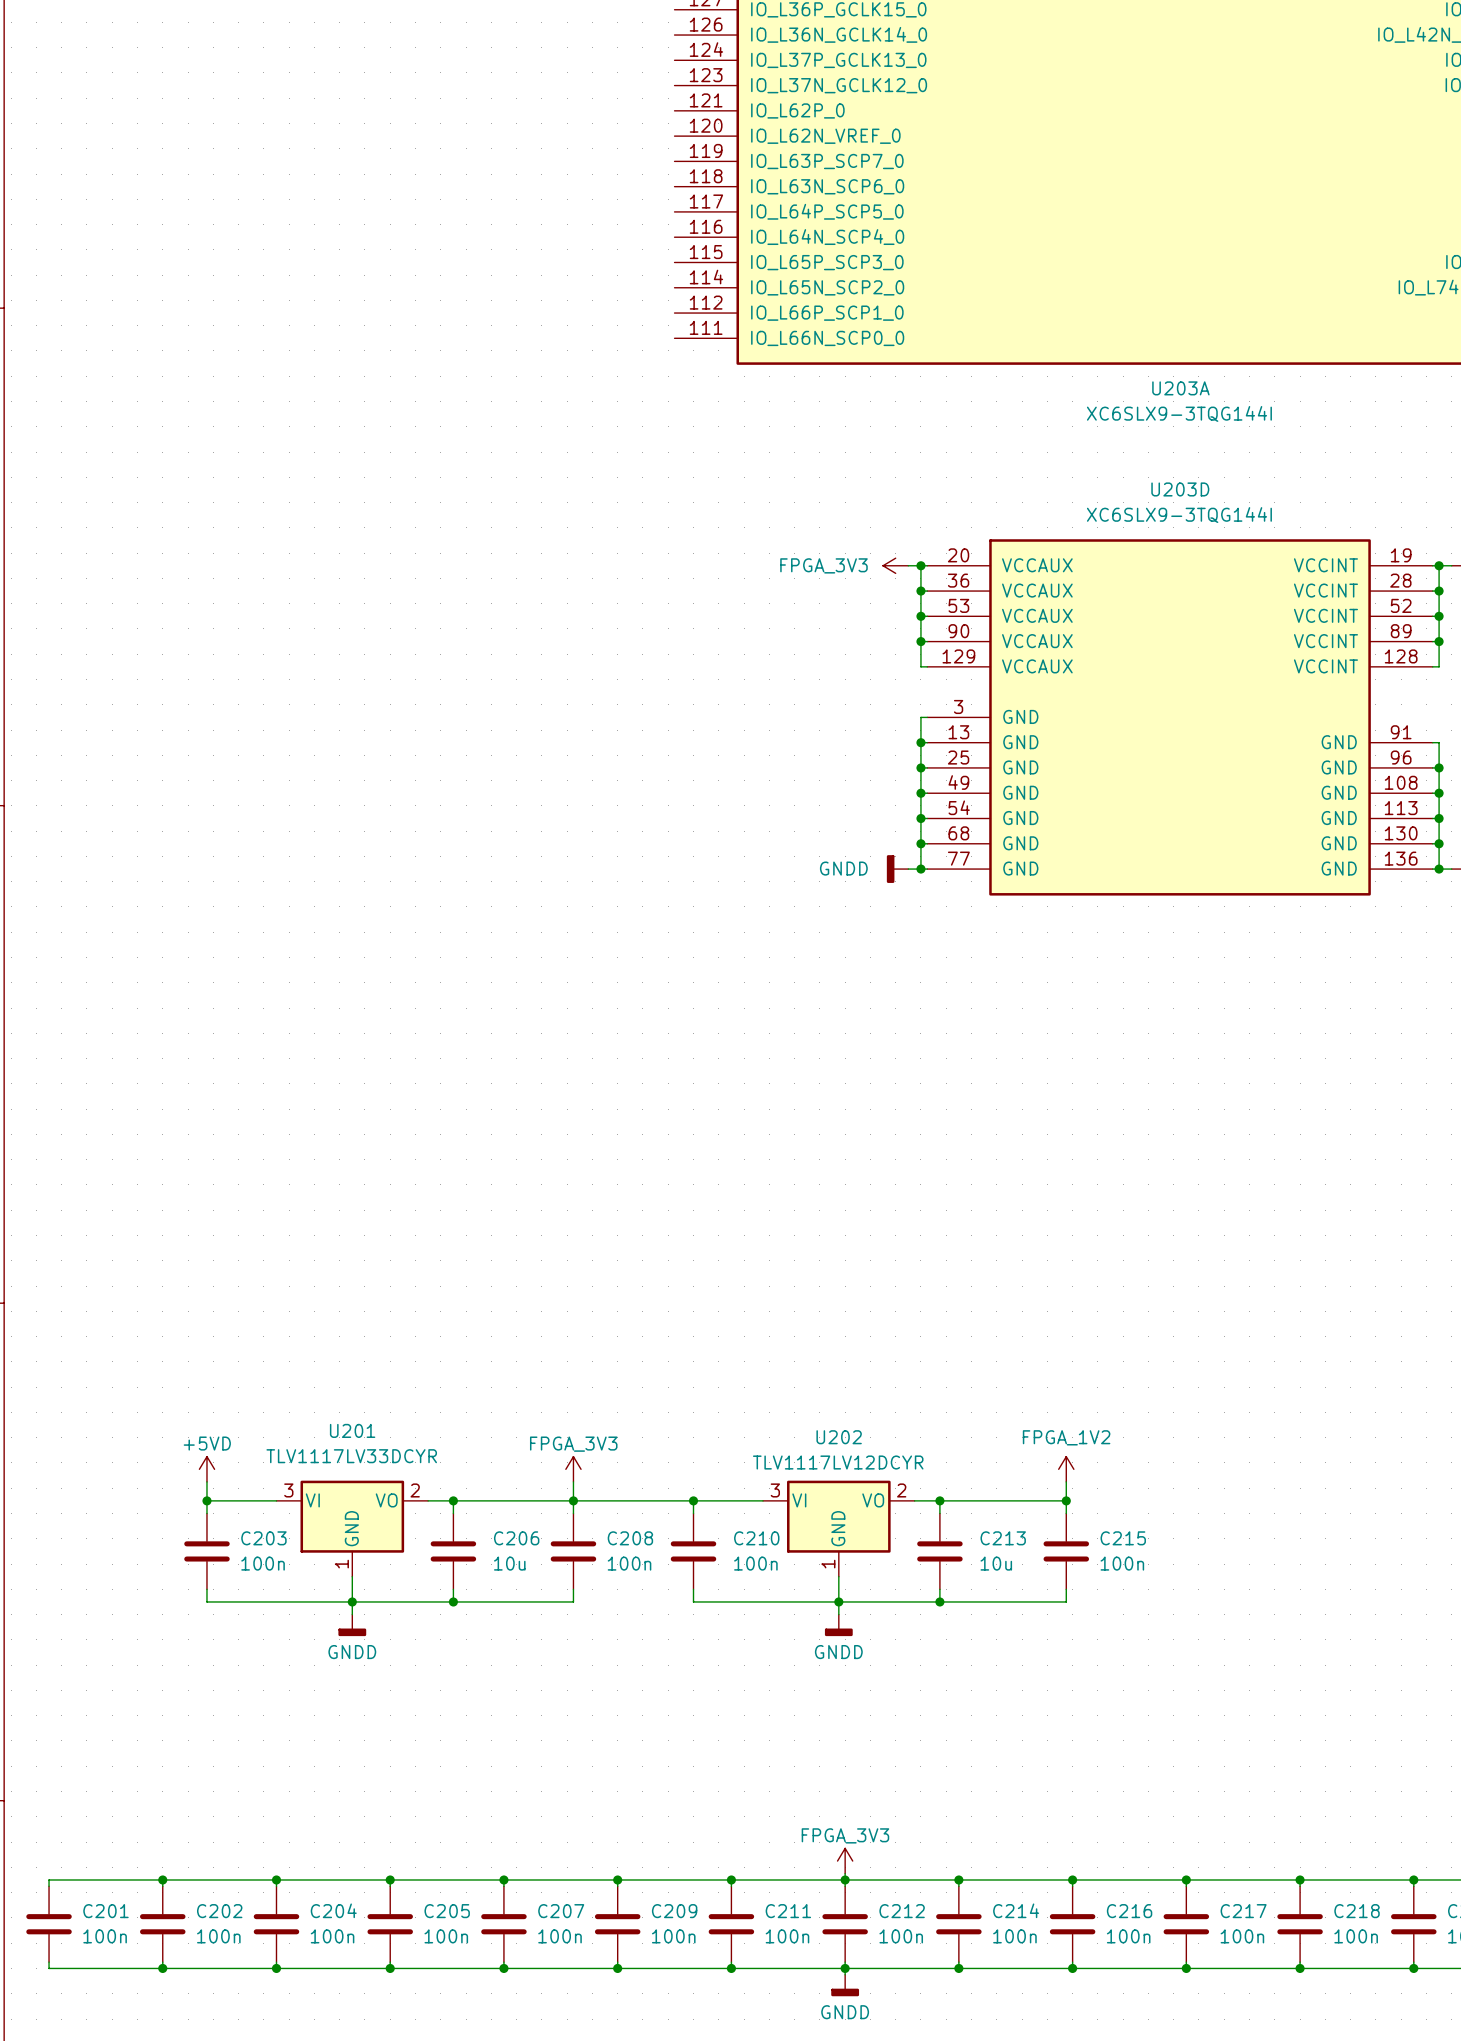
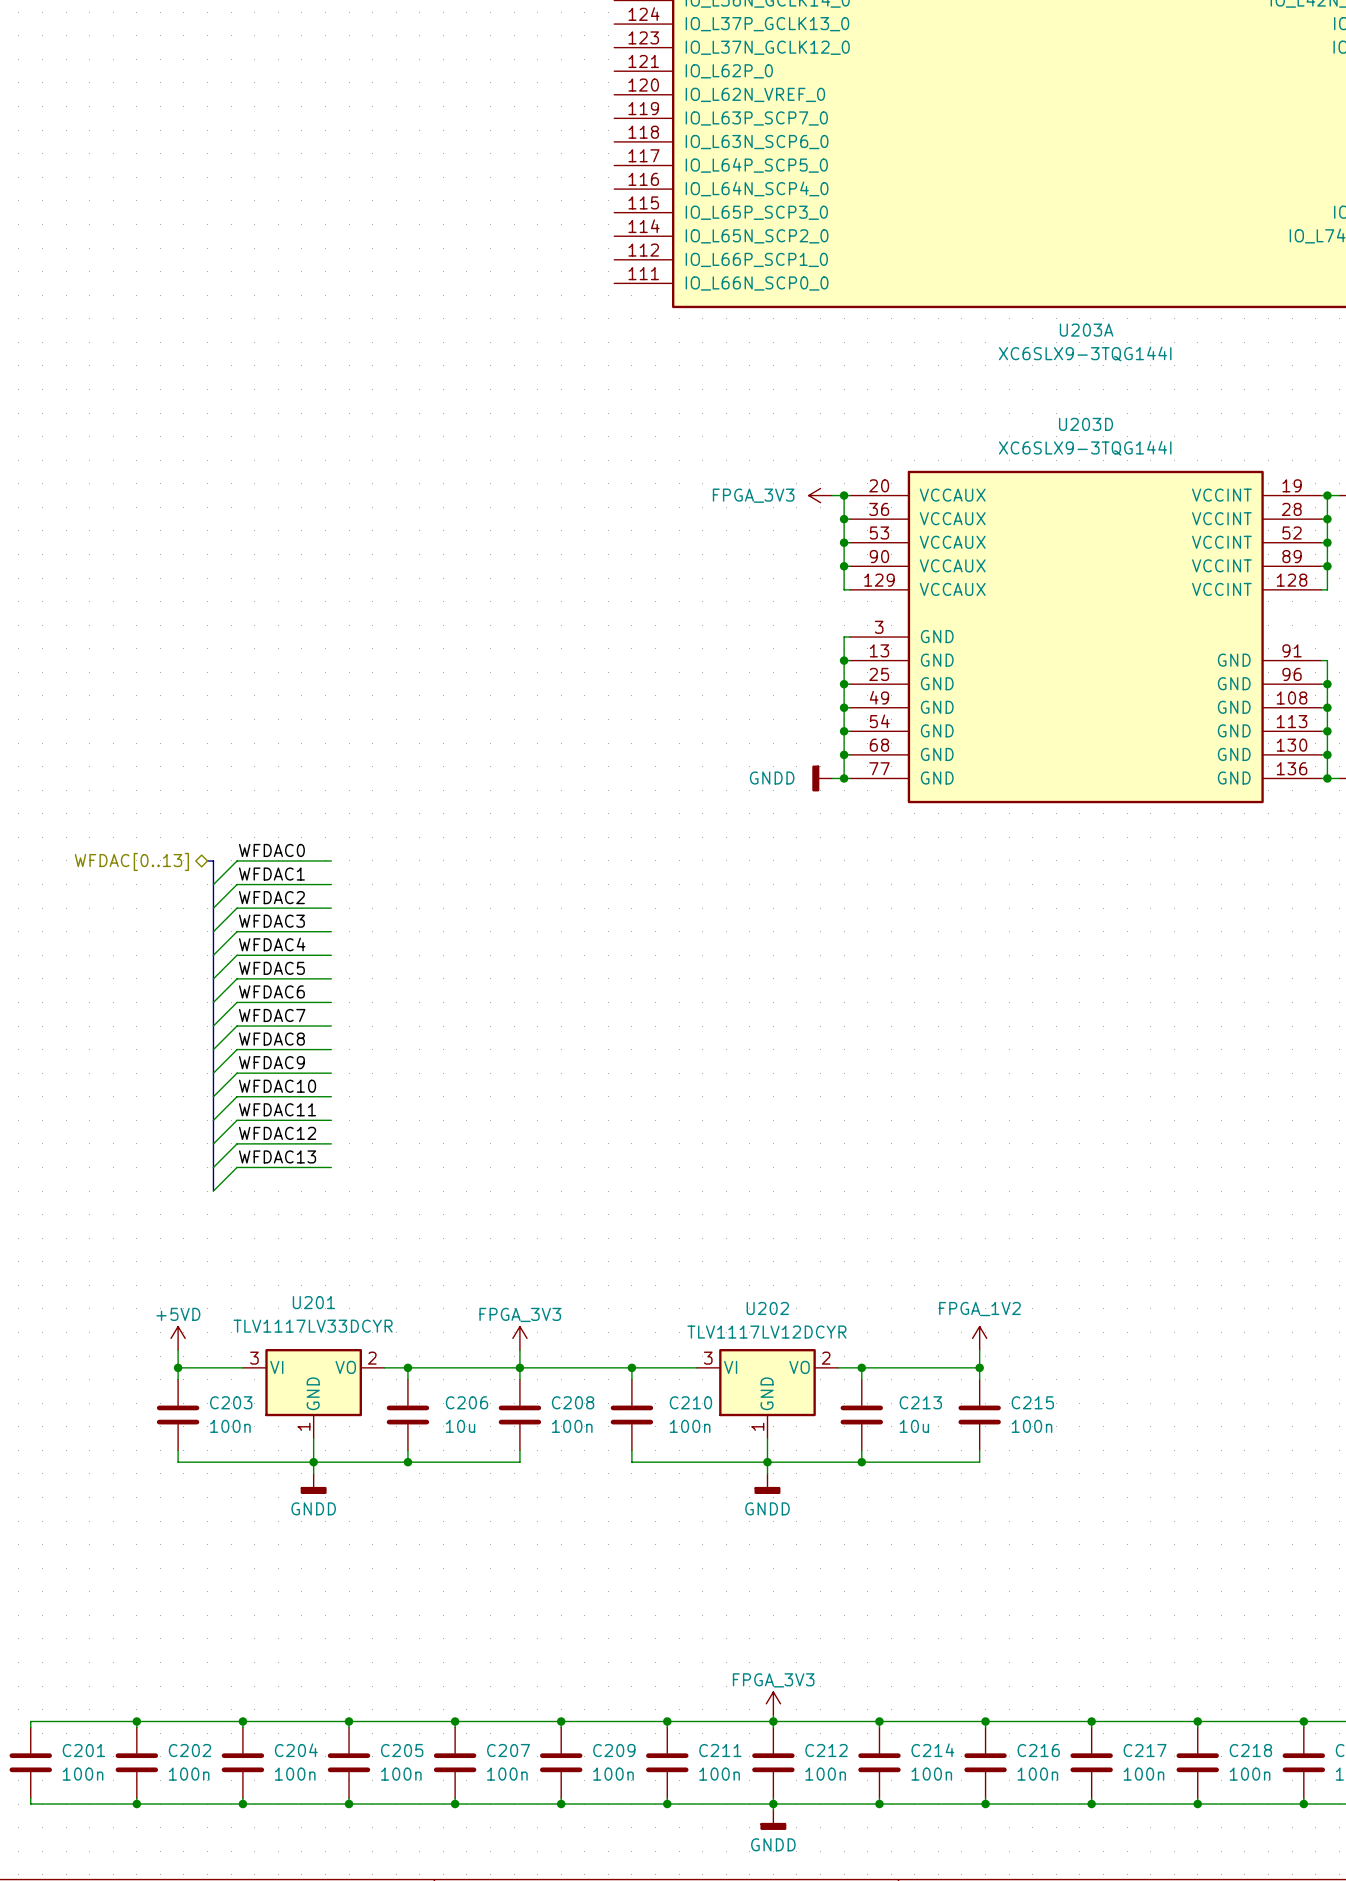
label: none -> WFDAC0 (271, 850)
bus: none -> (207, 860) (213, 860) (213, 1191)
wire: none -> (331, 860) (237, 860) (213, 884)
hierarchical label: none -> WFDAC[0..13] (131, 861)
label: none -> WFDAC1 (271, 874)
wire: none -> (331, 884) (237, 884) (213, 908)
label: none -> WFDAC2 (271, 897)
wire: none -> (331, 908) (237, 908) (213, 931)
label: none -> WFDAC3 (271, 921)
wire: none -> (331, 931) (237, 931) (213, 955)
label: none -> WFDAC4 (272, 944)
wire: none -> (331, 955) (237, 955) (213, 978)
label: none -> WFDAC5 (271, 968)
wire: none -> (331, 978) (237, 978) (213, 1002)
label: none -> WFDAC6 (271, 991)
wire: none -> (331, 1002) (237, 1002) (213, 1026)
label: none -> WFDAC7 (272, 1015)
wire: none -> (331, 1026) (237, 1026) (213, 1049)
label: none -> WFDAC8 (271, 1039)
wire: none -> (331, 1049) (237, 1049) (213, 1073)
label: none -> WFDAC9 (271, 1062)
wire: none -> (331, 1073) (237, 1073) (213, 1096)
label: none -> WFDAC10 (277, 1086)
wire: none -> (331, 1096) (237, 1096) (213, 1120)
label: none -> WFDAC11 (277, 1109)
wire: none -> (331, 1120) (237, 1120) (213, 1143)
label: none -> WFDAC12 (277, 1133)
wire: none -> (331, 1143) (237, 1143) (213, 1167)
label: none -> WFDAC13 (277, 1156)
wire: none -> (331, 1167) (237, 1167) (213, 1191)

